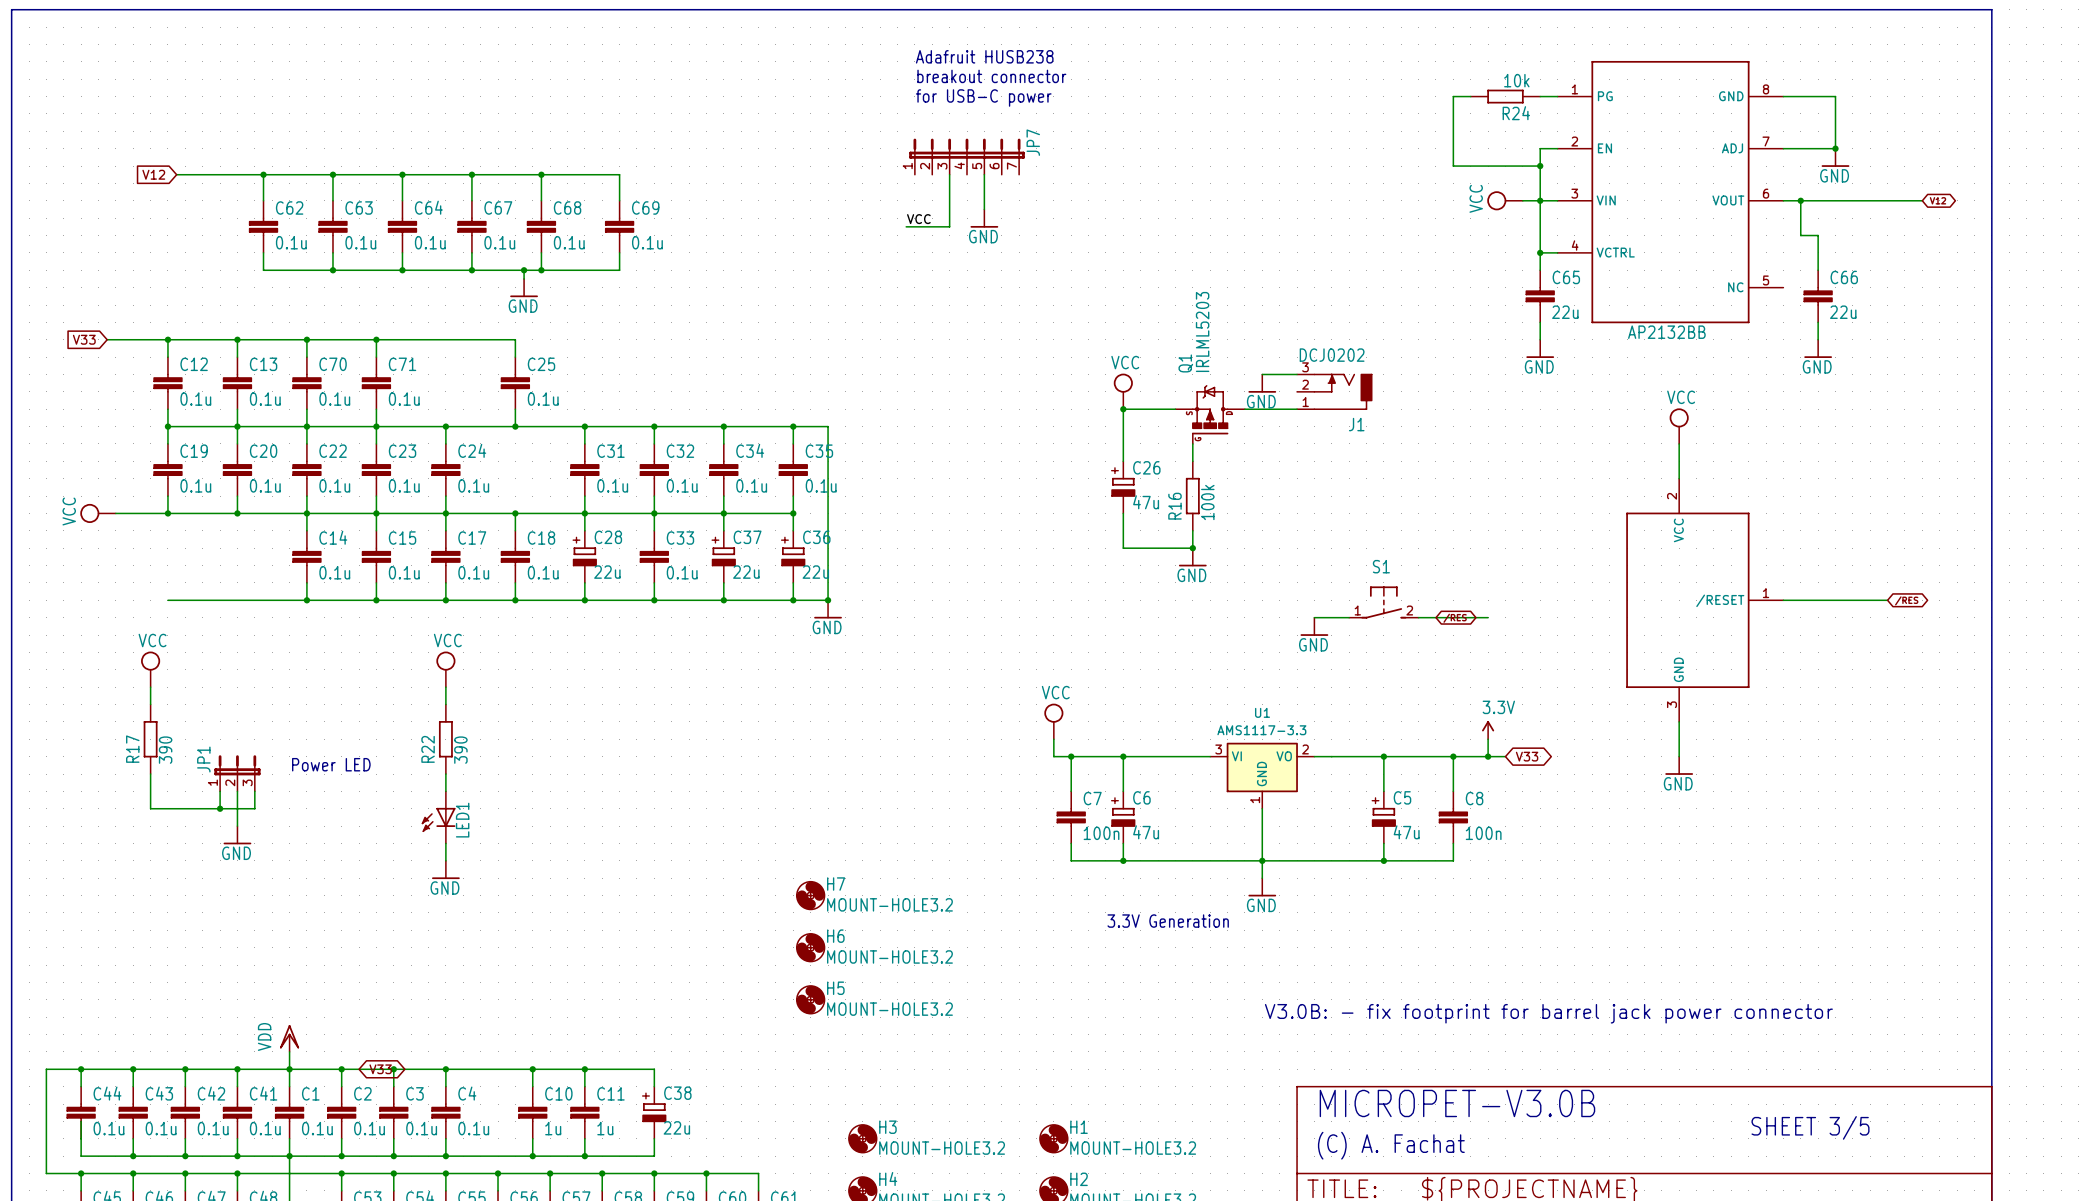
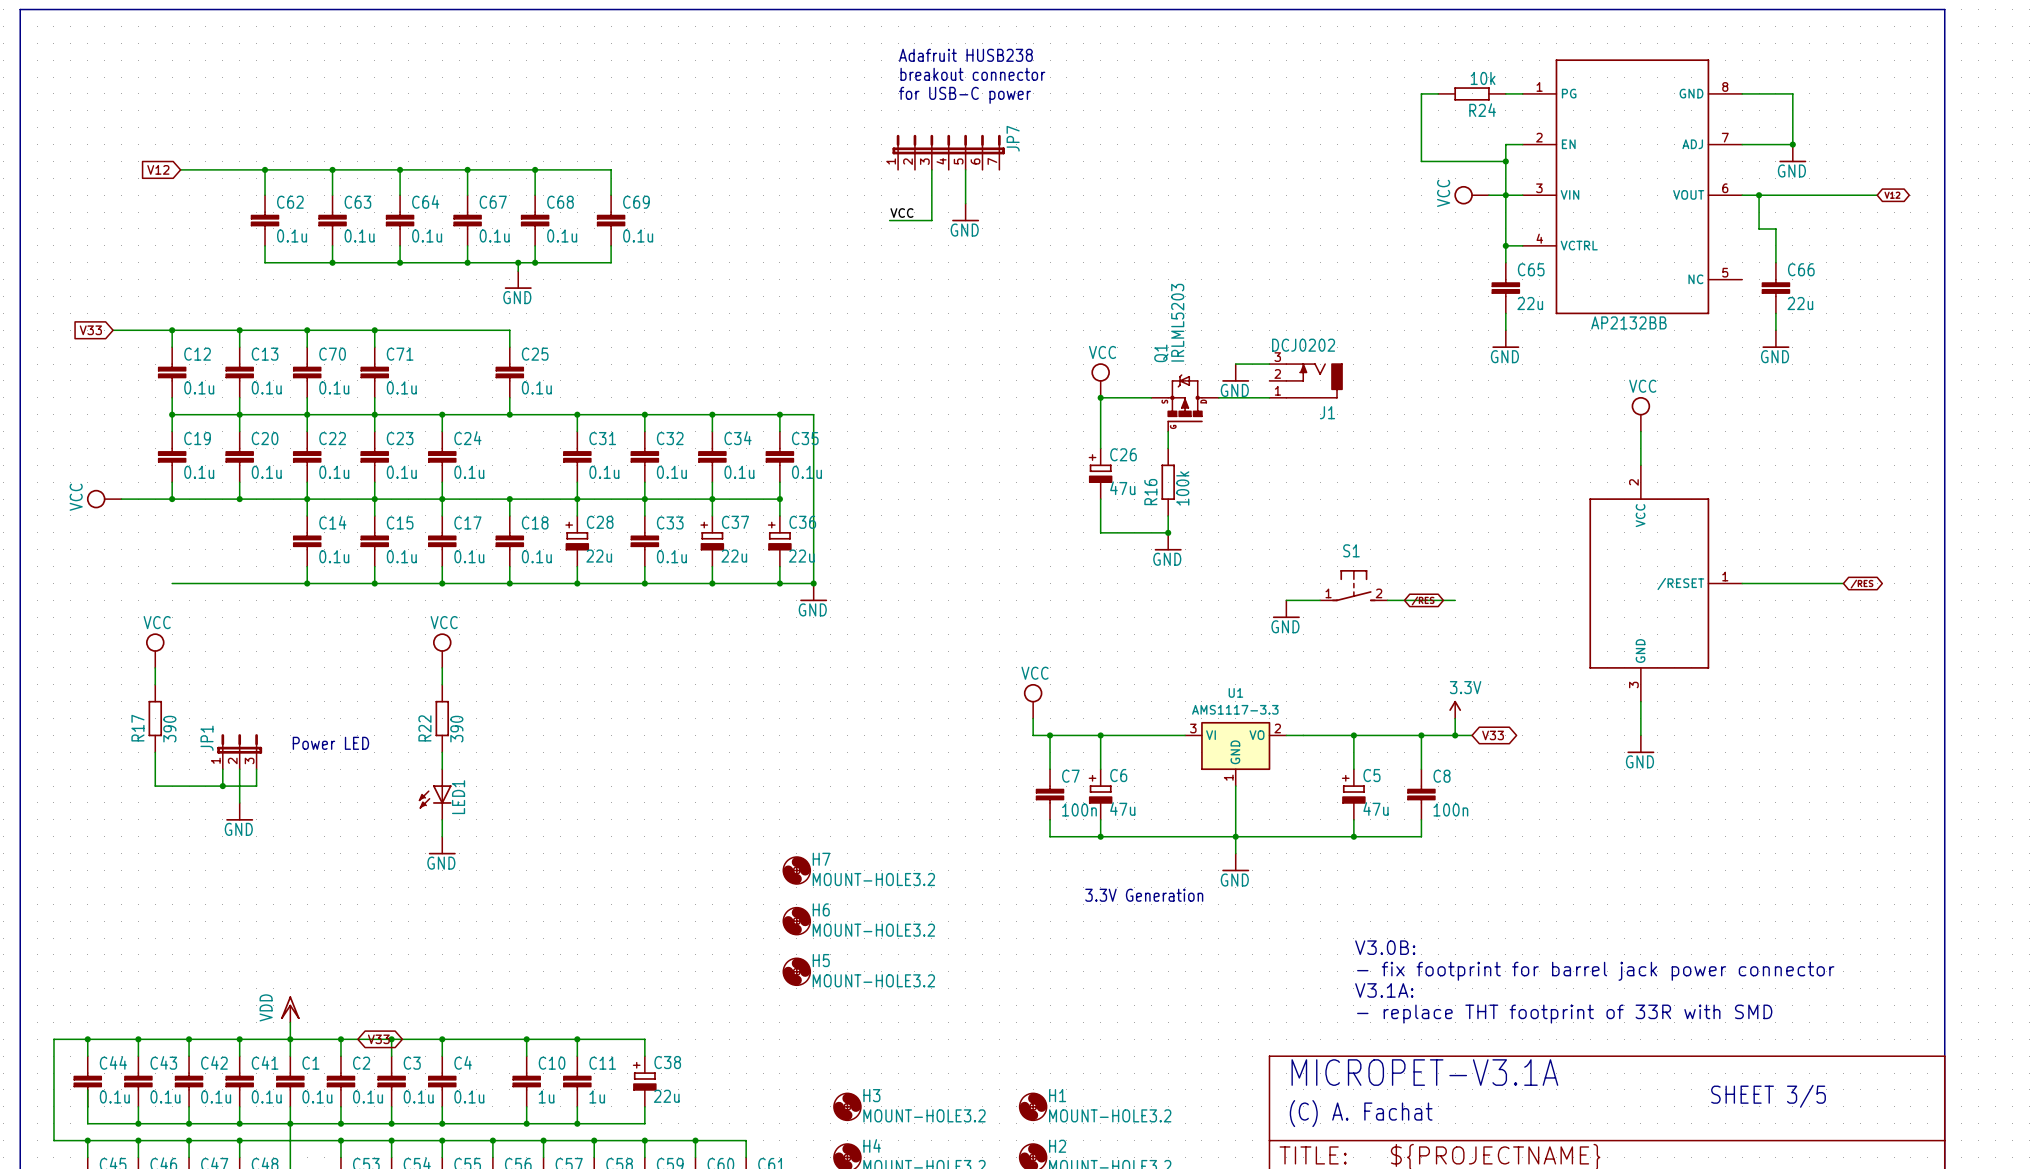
text: none -> V3.0B: (1385, 947)
text: V3.0B: - fix footprint for barrel jack power connector (1548, 1013) -> - fix footprint for barrel jack power connector (1595, 971)
text: none -> V3.1A: (1384, 990)
text: none -> - replace THT footprint of 33R with SMD (1564, 1014)
text: MICROPET-V3.0B (1457, 1103) -> MICROPET-V3.1A (1424, 1072)

